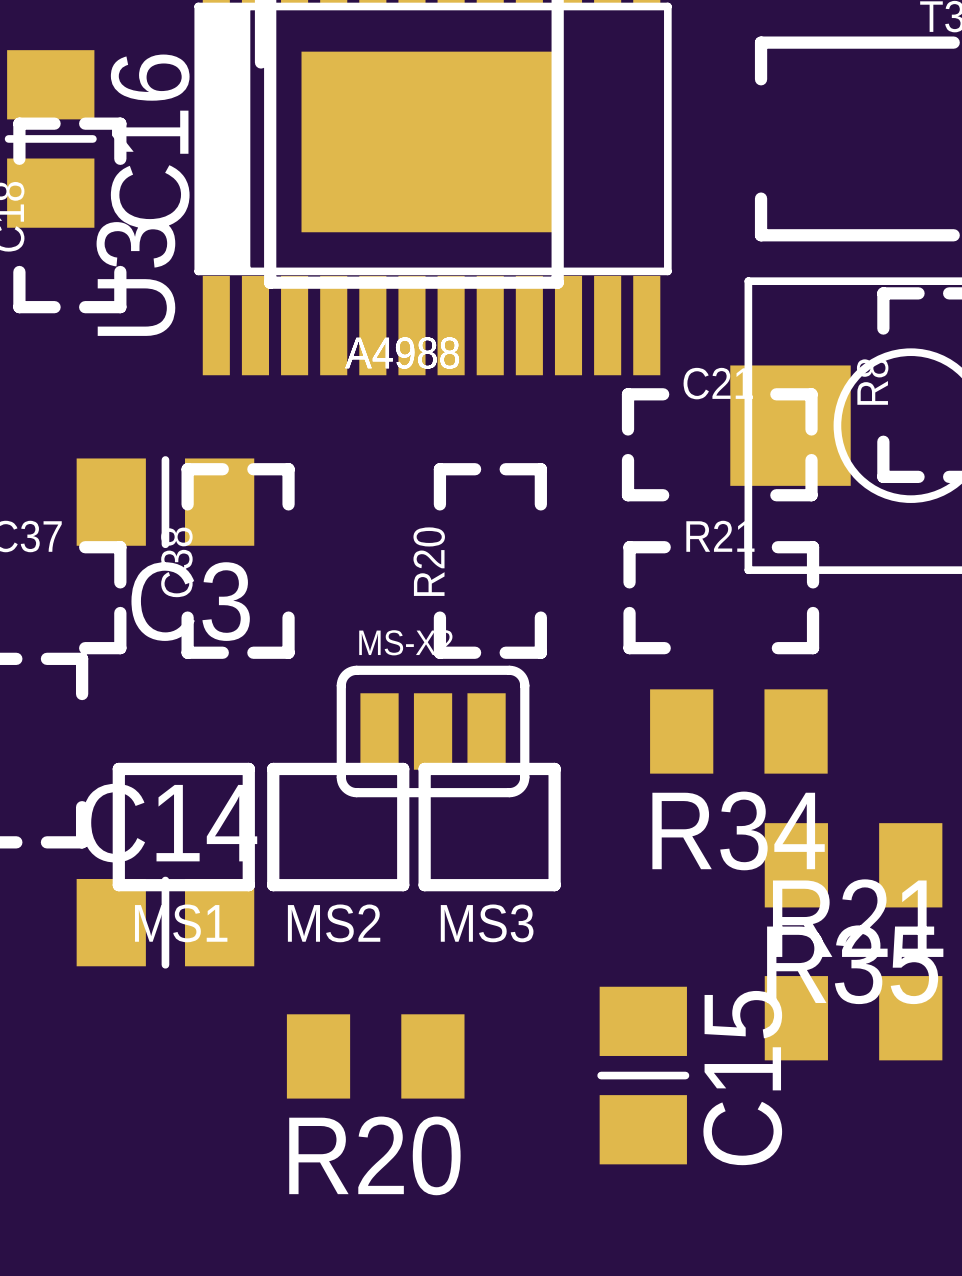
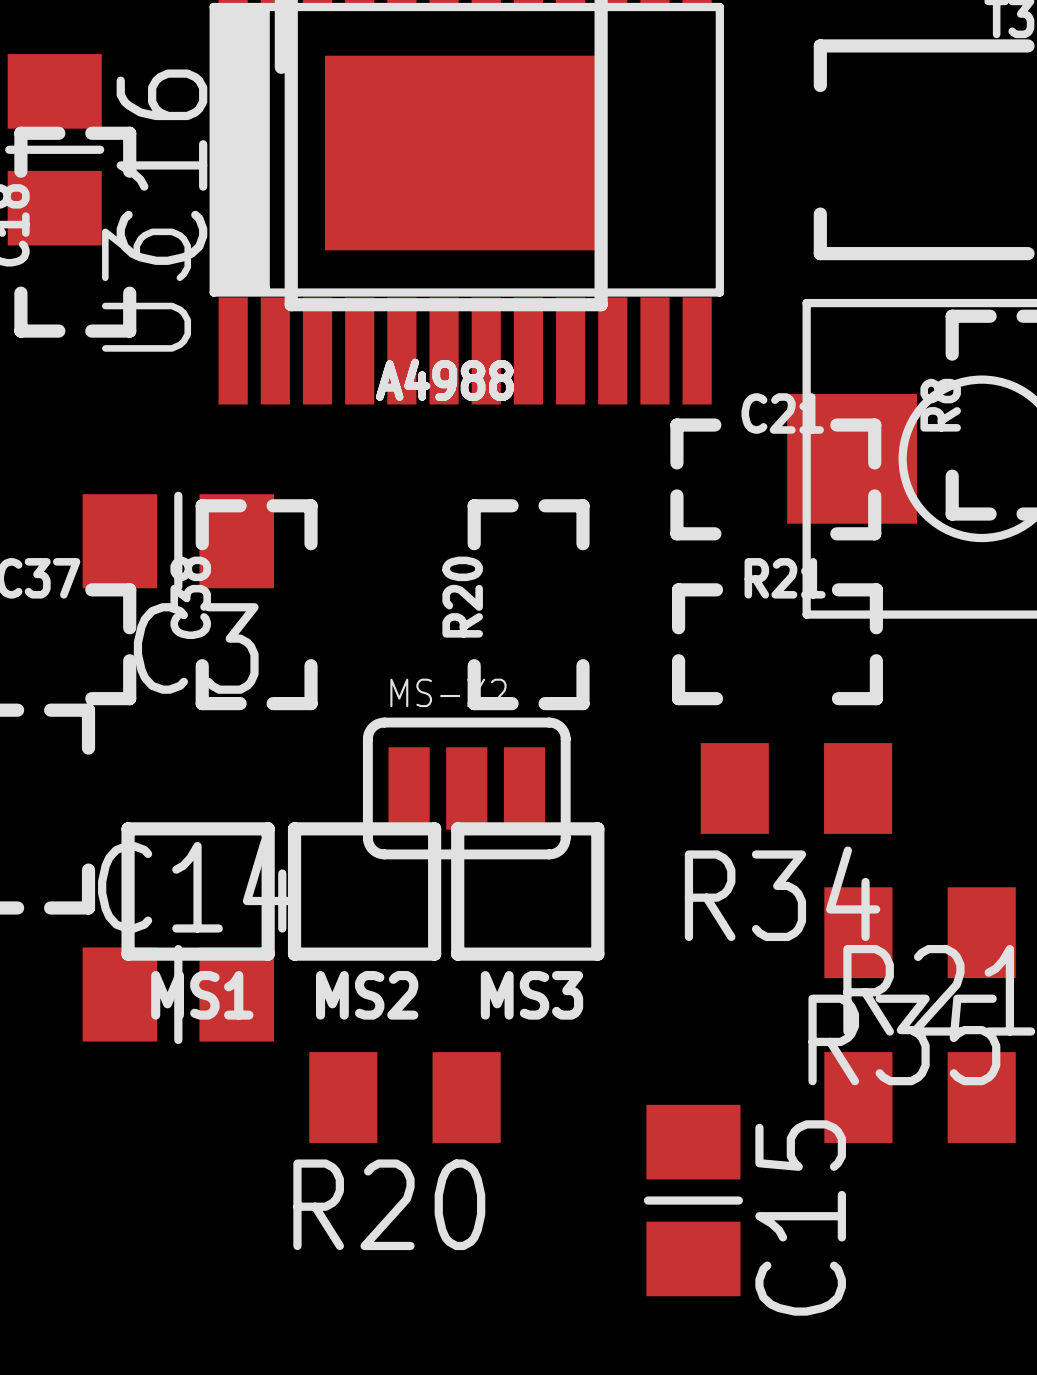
R20 position: (375, 1056) -> (404, 1097)
C15 position: (643, 1075) -> (693, 1200)

